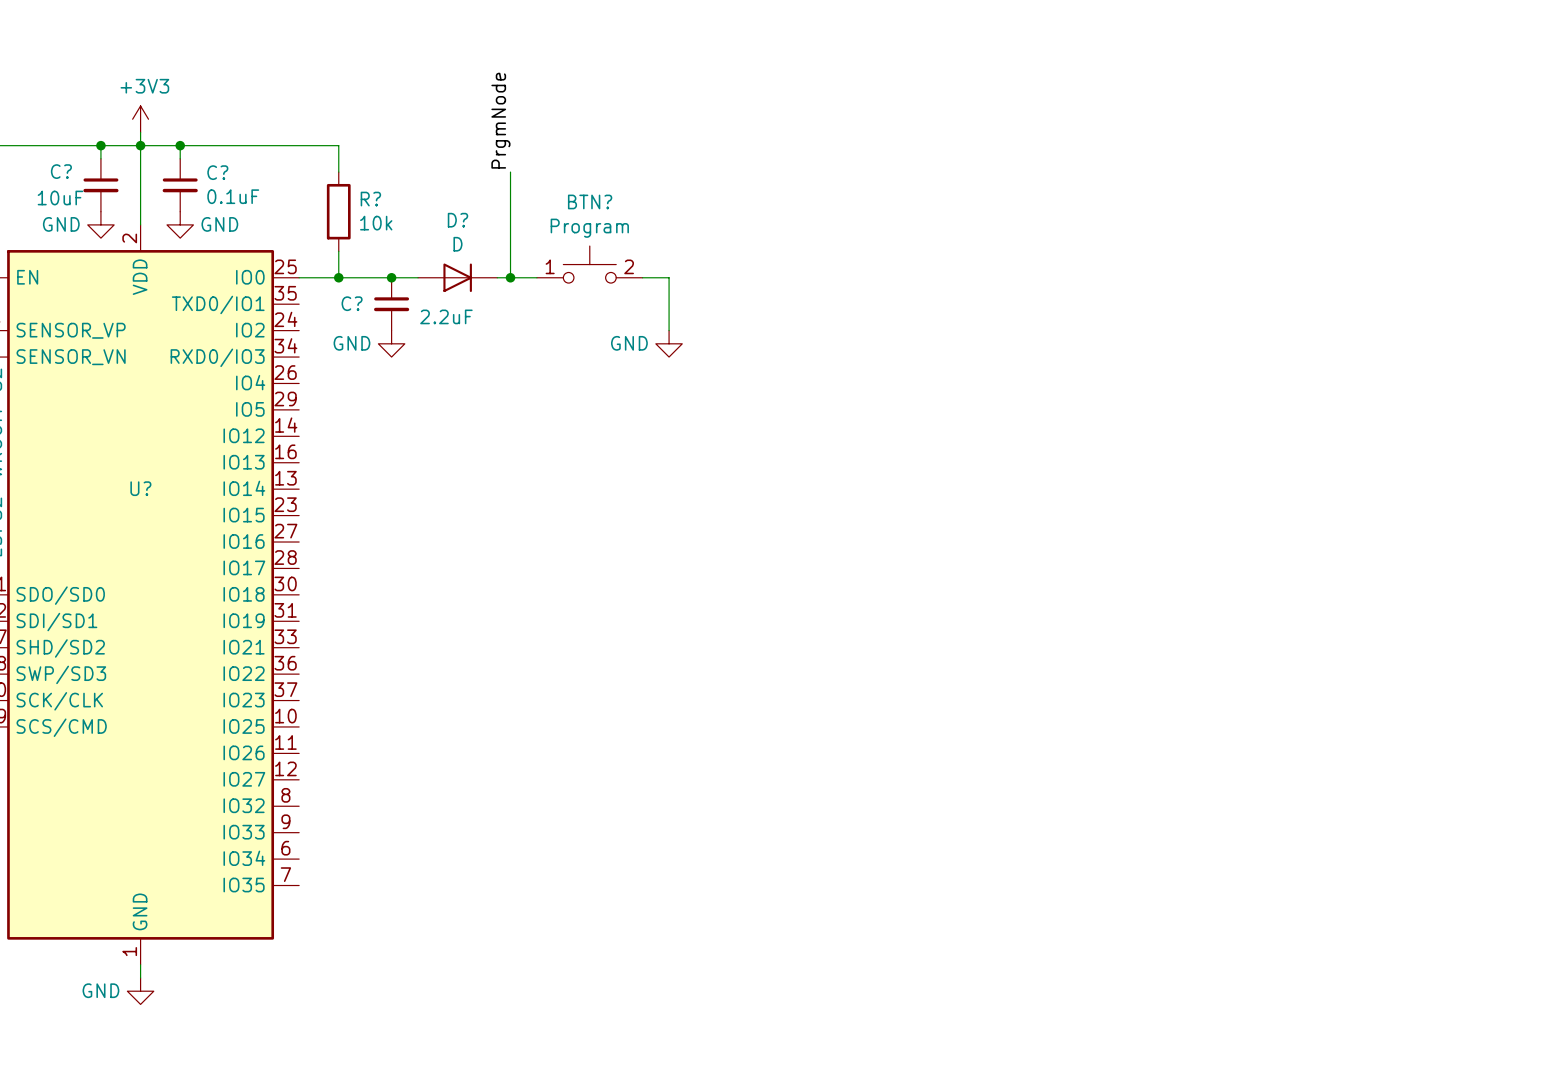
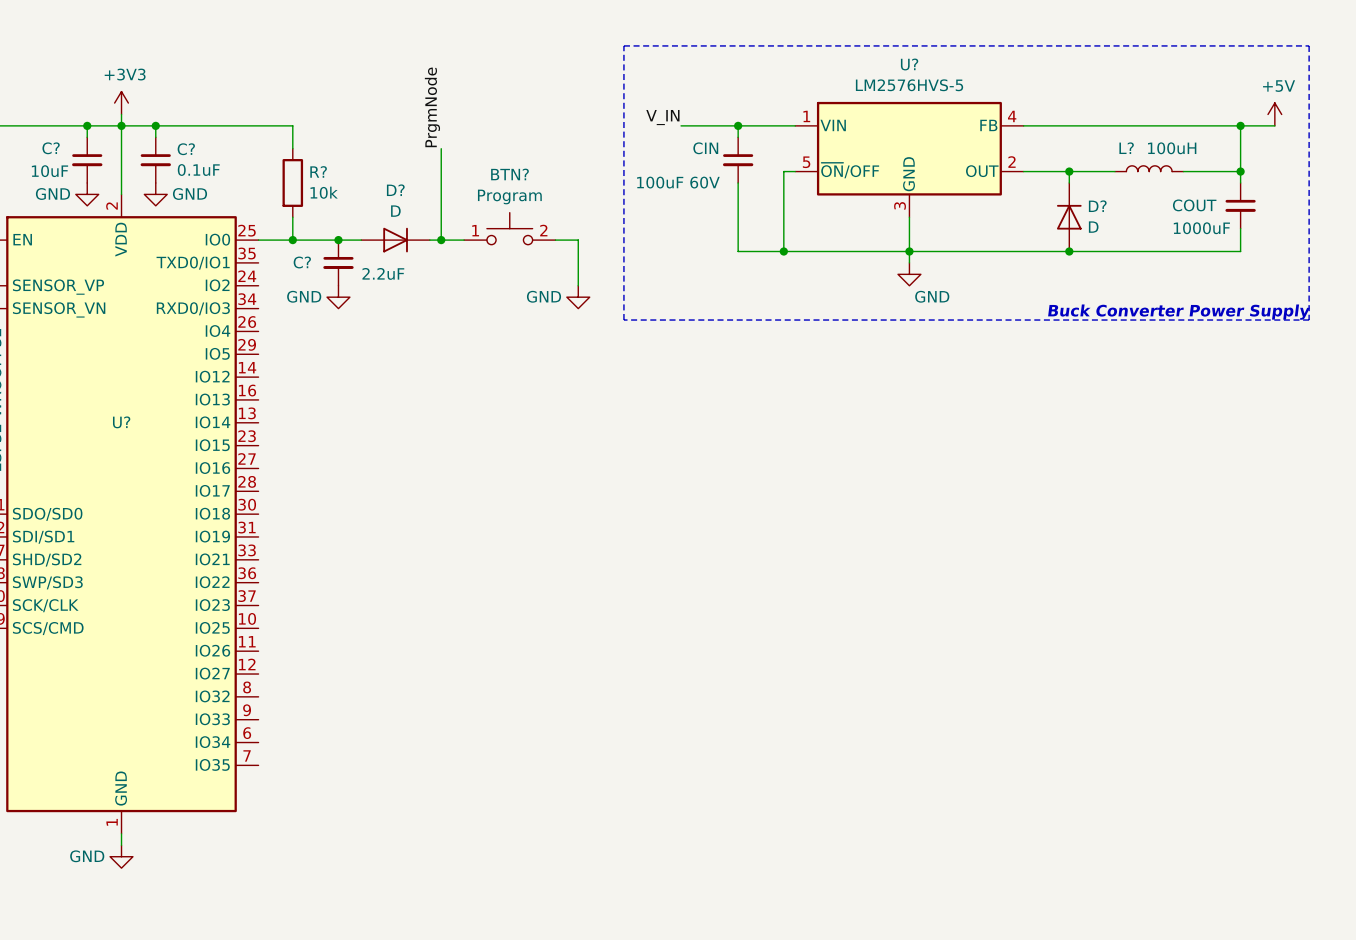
line: none -> (623, 45) (1309, 45) (1309, 320) (623, 320) (623, 45)
power symbol: none -> +5V (1274, 114)
label: none -> V_IN (662, 117)
wire: none -> (681, 125) (795, 125)
wire: none -> (738, 125) (738, 137)
junction: none -> (738, 125)
wire: none -> (1023, 125) (1274, 125)
wire: none -> (1240, 125) (1240, 182)
junction: none -> (1240, 125)
U?: none -> LM2576HVS-5 (909, 159)
CIN: none -> 100uF 60V (738, 160)
L?: none -> 100uH (1149, 168)
wire: none -> (795, 171) (783, 171) (783, 251)
wire: none -> (1023, 171) (1114, 171)
wire: none -> (1069, 171) (1069, 182)
junction: none -> (1069, 171)
wire: none -> (1183, 171) (1240, 171)
junction: none -> (1240, 171)
wire: none -> (738, 182) (738, 251) (1240, 251) (1240, 228)
COUT: none -> 1000uF (1240, 205)
wire: none -> (909, 217) (909, 262)
D?: none -> D (1069, 217)
junction: none -> (783, 251)
junction: none -> (909, 251)
junction: none -> (1069, 251)
power symbol: none -> GND (909, 274)
text: none -> Buck Converter Power Supply (1179, 312)

